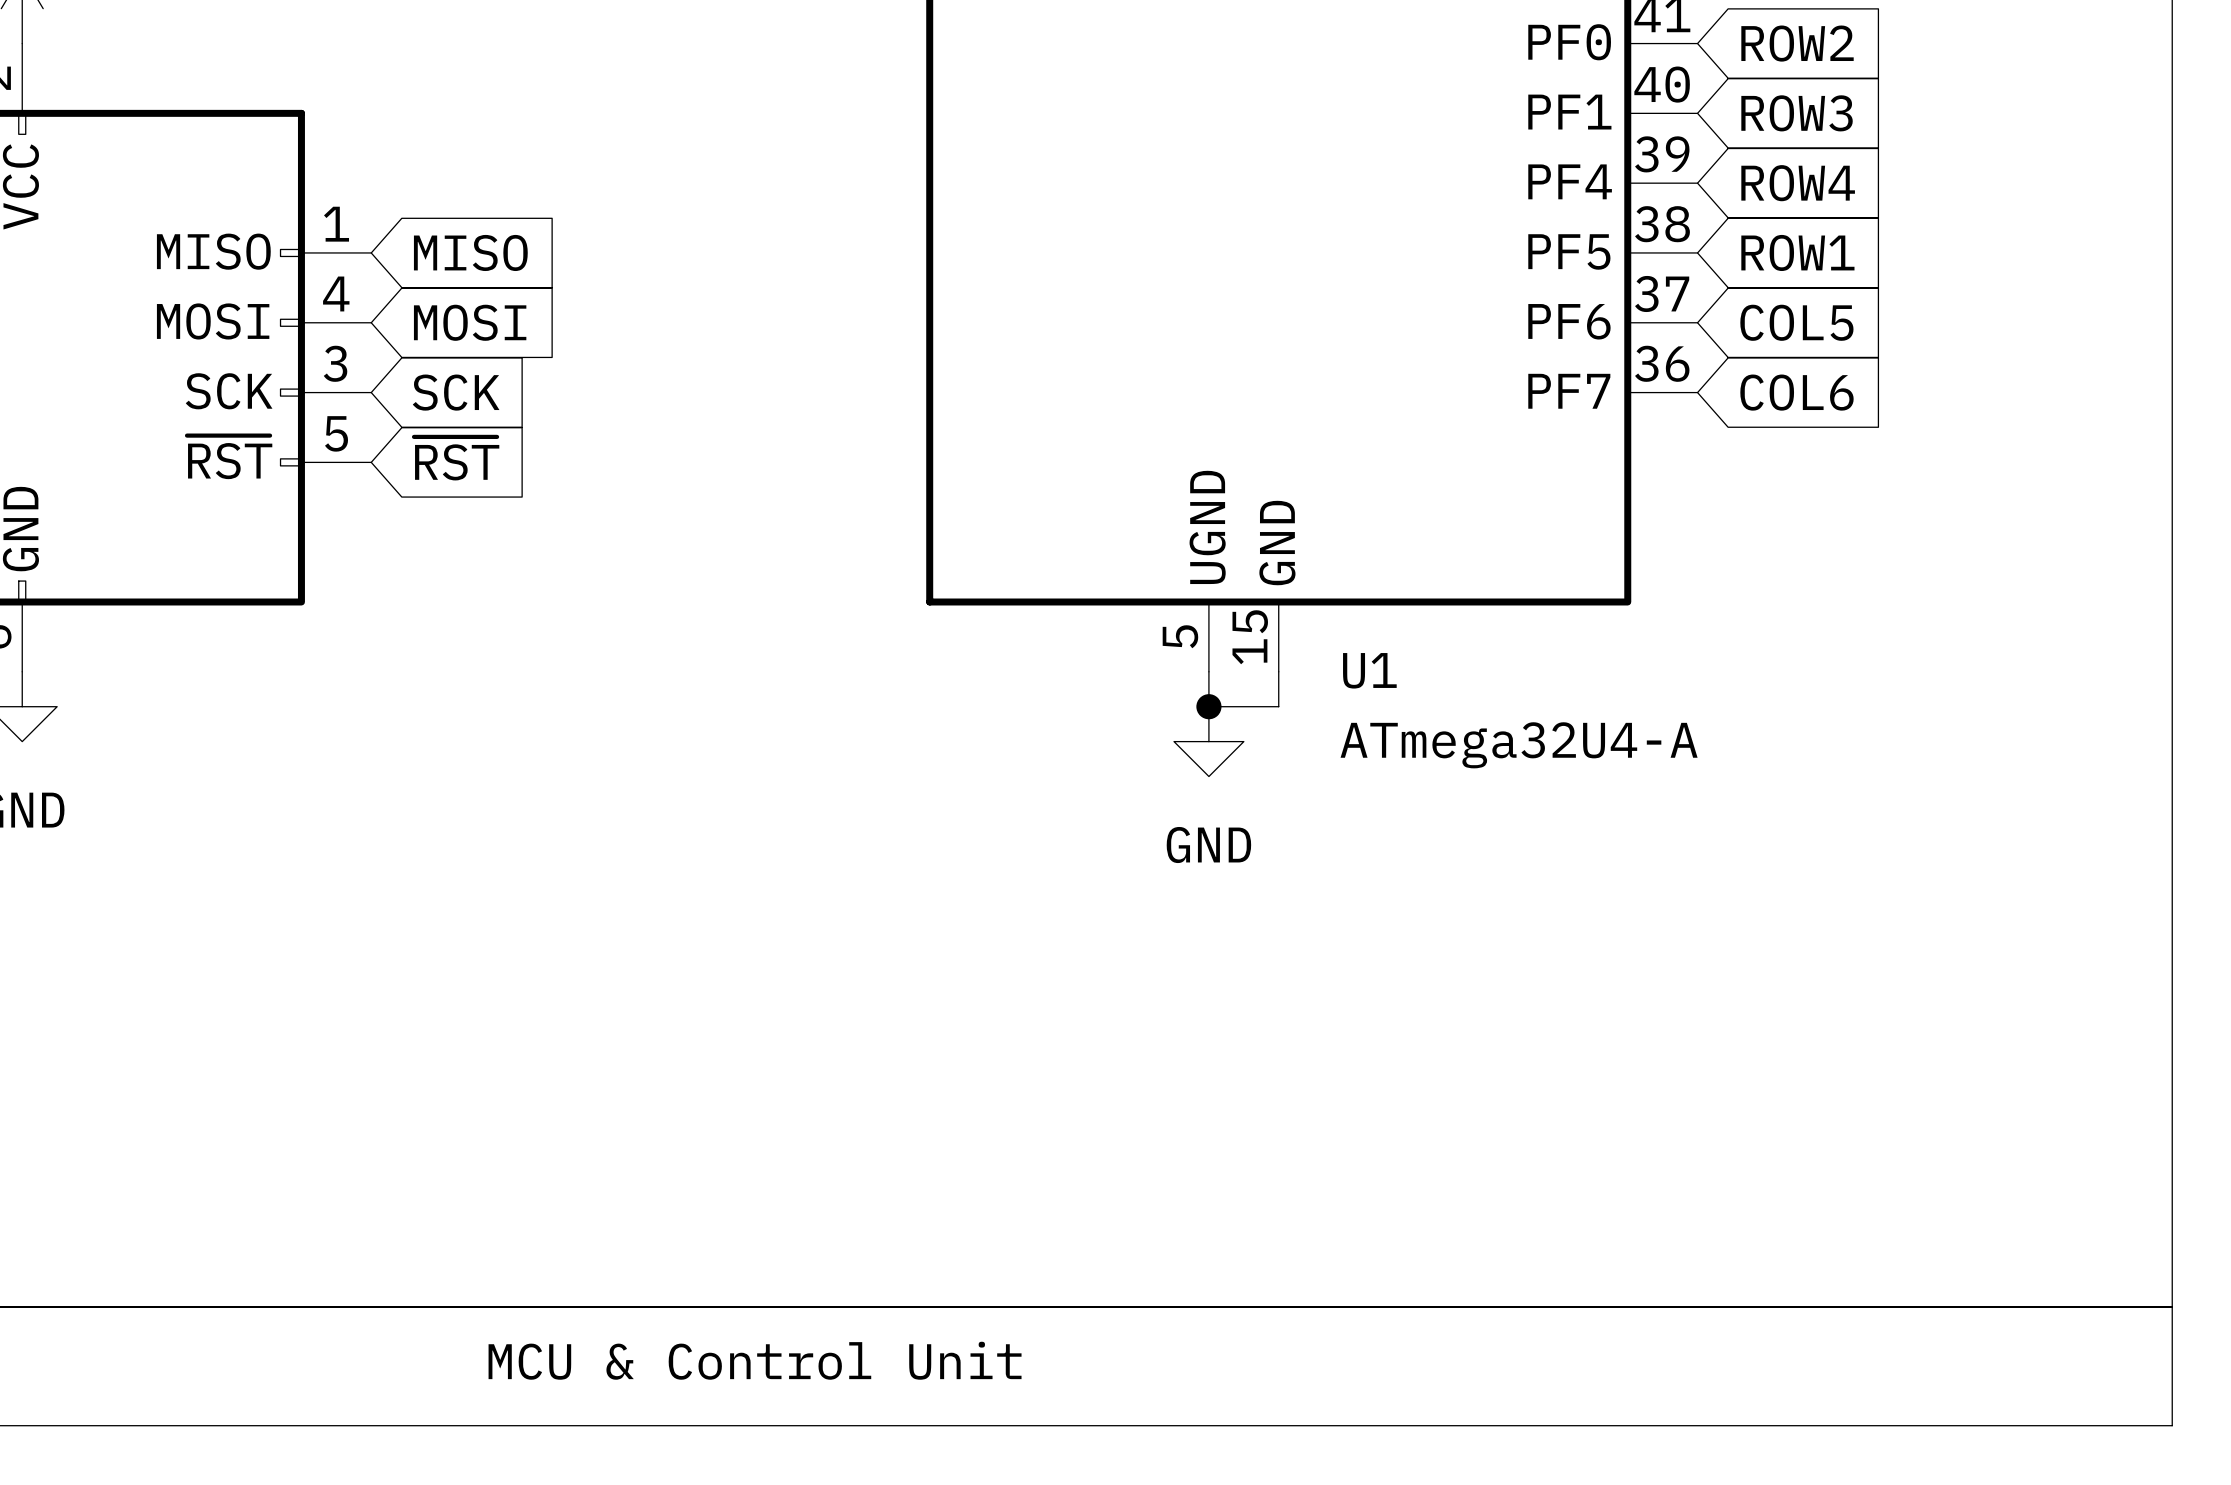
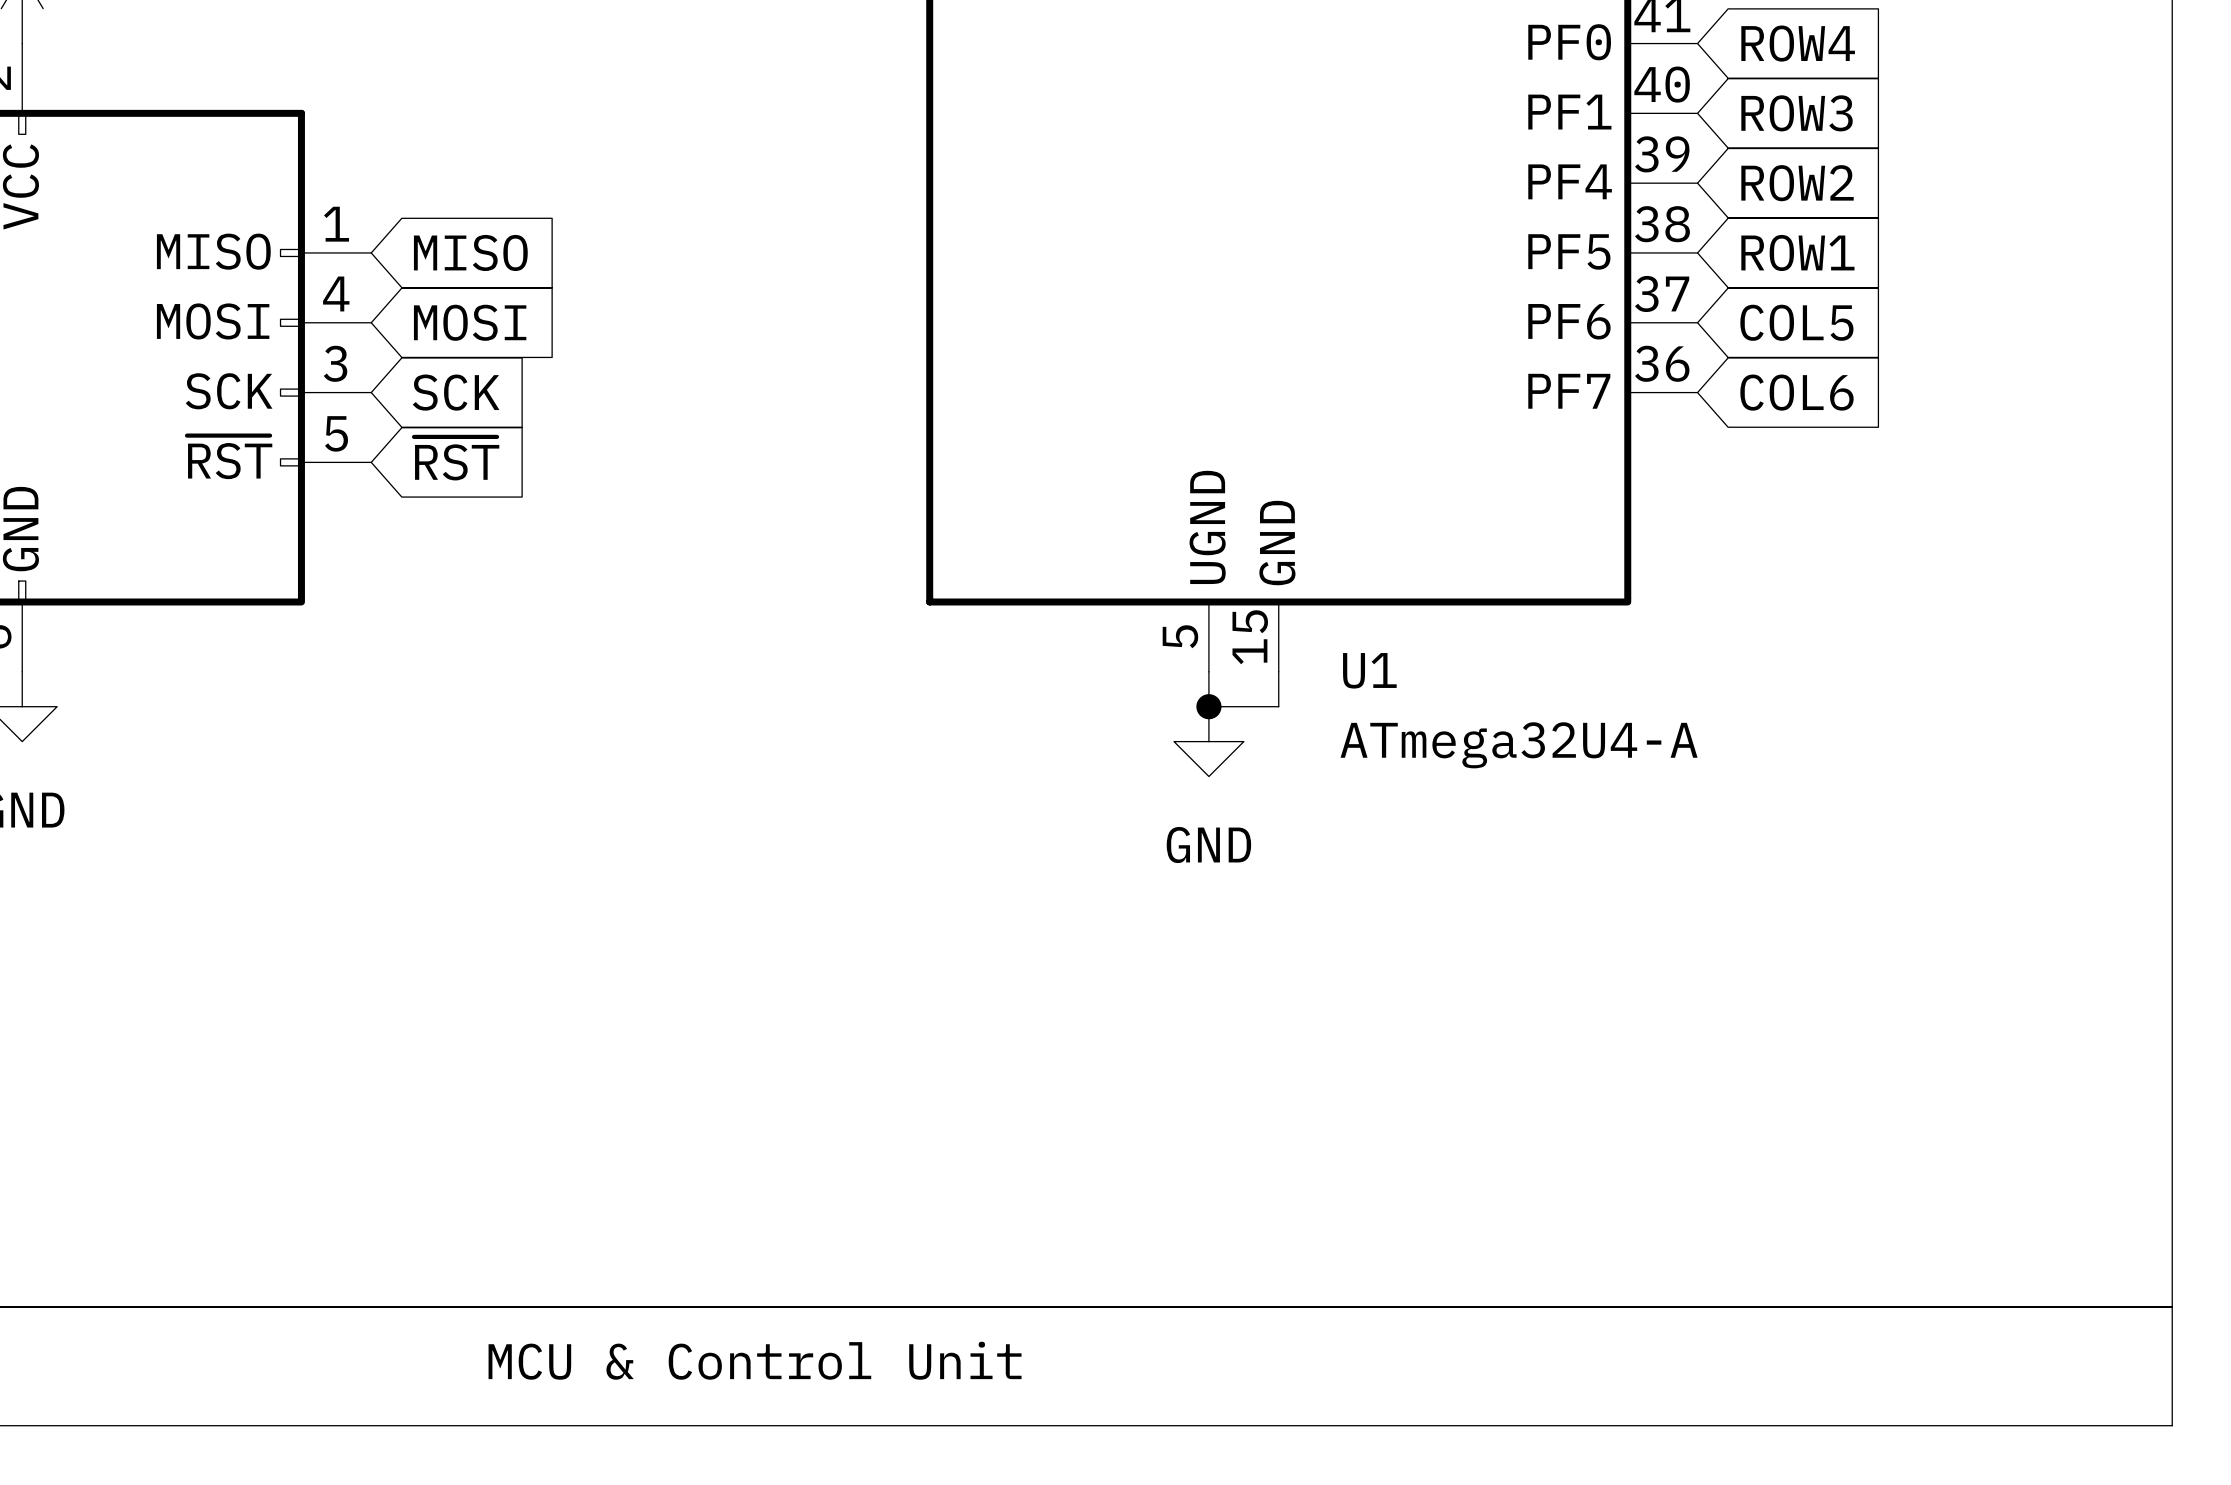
global label: ROW2 (1797, 43) -> ROW4 (1798, 43)
global label: ROW4 (1798, 183) -> ROW2 (1797, 183)

